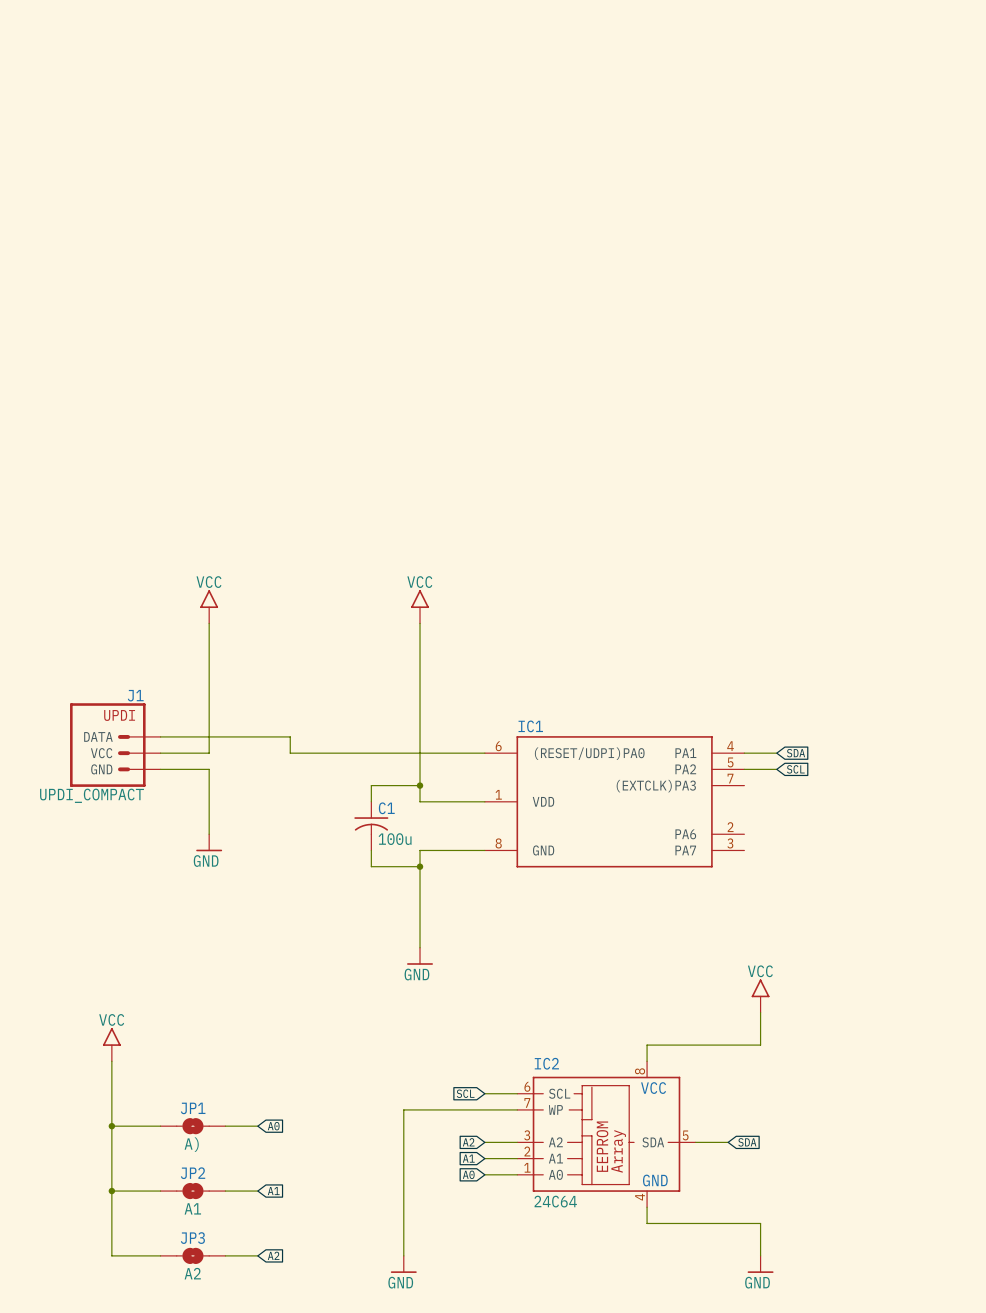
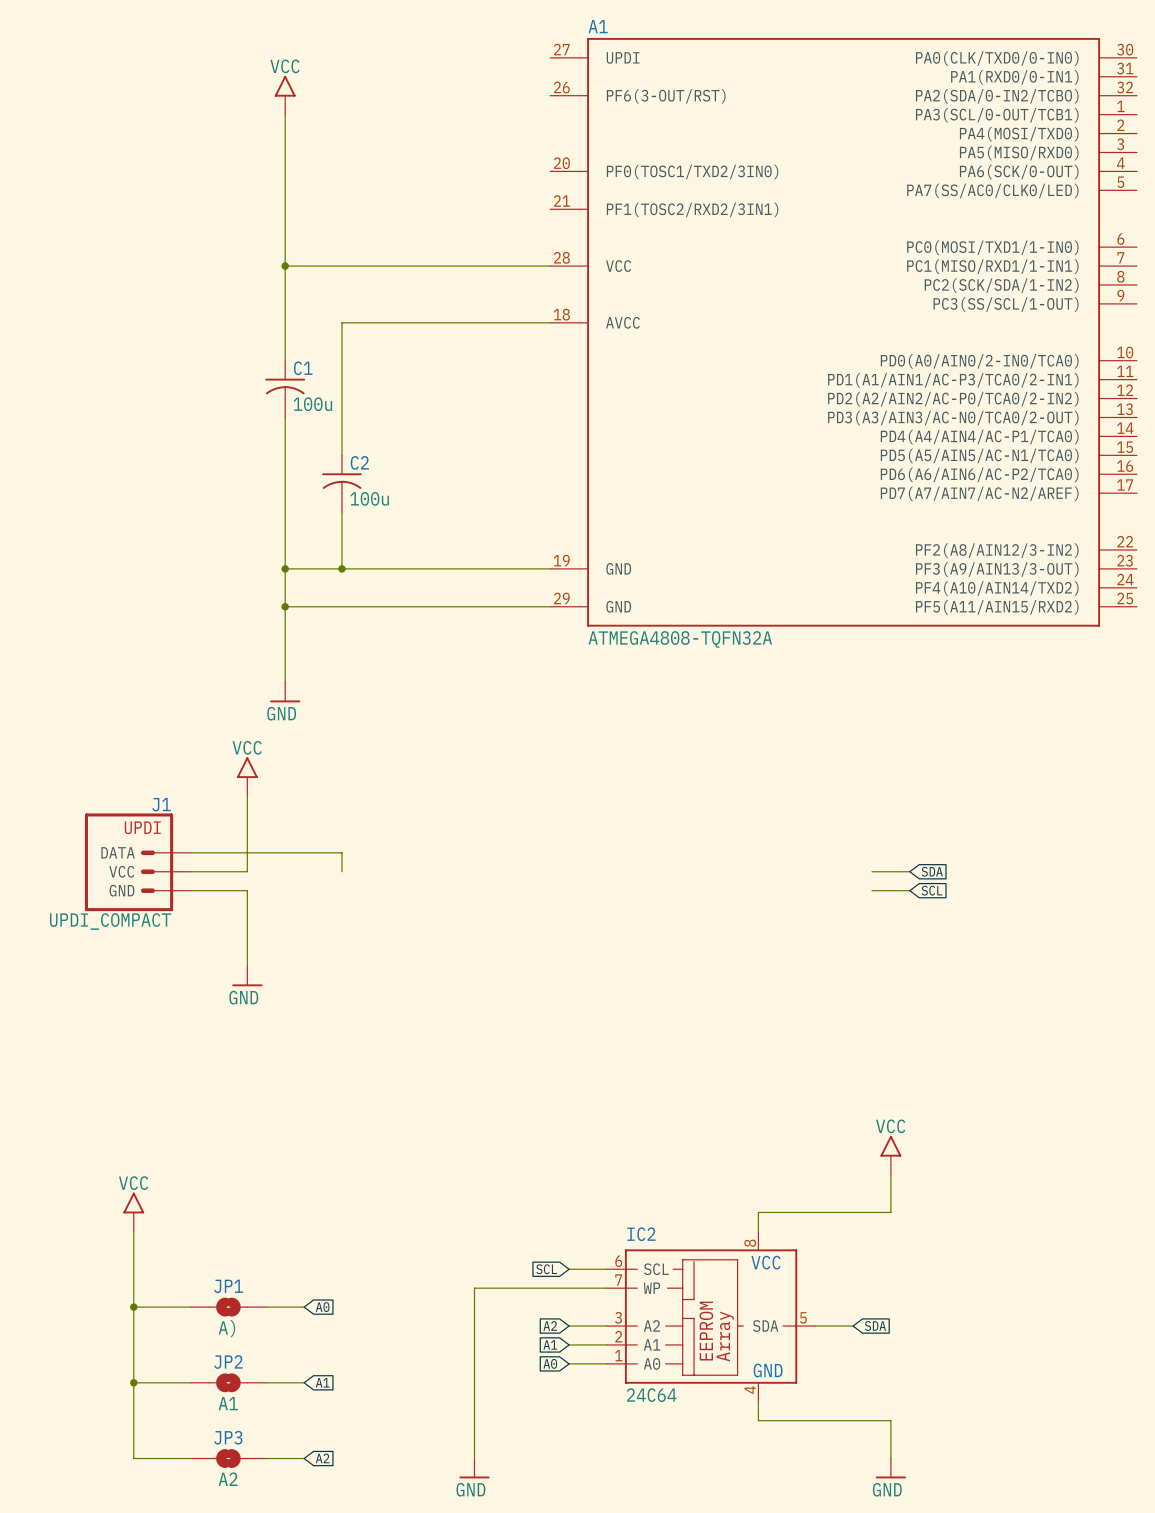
power symbol: none -> (285, 95)
wire: none -> (285, 114) (285, 360)
wire: none -> (285, 266) (550, 266)
junction: none -> (285, 266)
wire: none -> (550, 322) (341, 322) (341, 455)
A1: none -> ATMEGA4808-TQFN32A (843, 332)
wire: none -> (285, 417) (285, 682)
C2: none -> 100u (341, 483)
wire: none -> (341, 512) (341, 568)
wire: none -> (285, 568) (550, 568)
junction: none -> (285, 568)
junction: none -> (341, 568)
wire: none -> (285, 606) (550, 606)
junction: none -> (285, 606)
power symbol: none -> GND (285, 692)
power symbol position: (209, 606) -> (247, 776)
power symbol: (420, 606) -> none
wire: (209, 623) (209, 688) -> none
wire: (420, 623) (420, 801) (484, 801) -> none
wire: (290, 753) (484, 753) -> none
wire: (420, 785) (371, 785) (371, 801) -> none
junction: (420, 785) -> none
IC1: (614, 801) -> none
C1 position: (371, 826) -> (285, 389)
wire: (371, 850) (371, 866) (420, 866) -> none
wire: (484, 850) (420, 850) (420, 947) -> none
junction: (420, 866) -> none
power symbol: GND (420, 956) -> none

